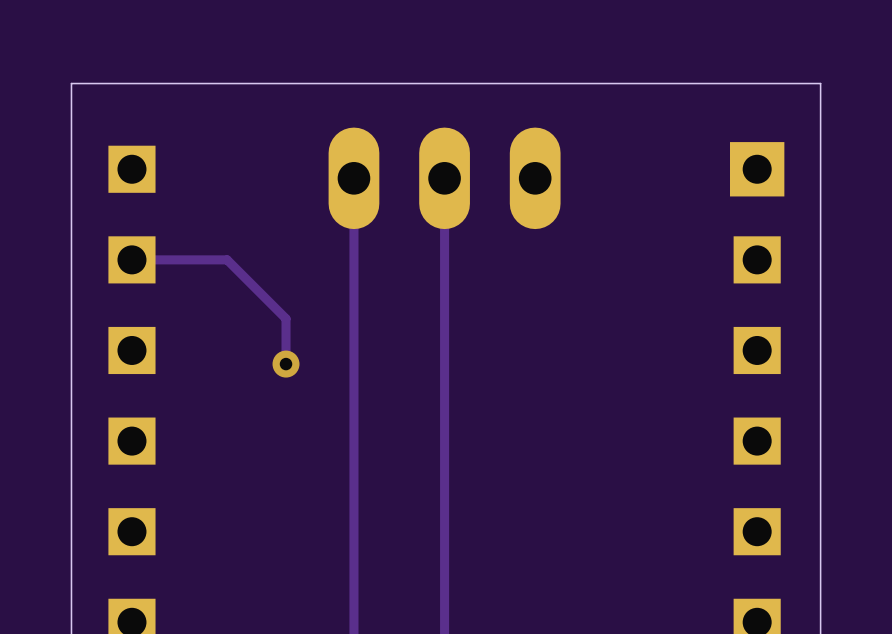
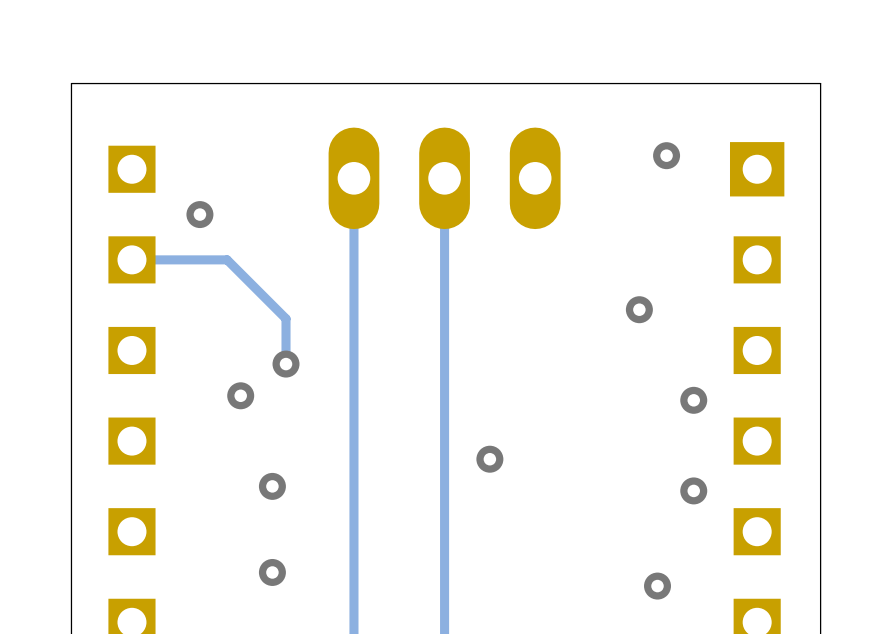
via: none -> (666, 155)
via: none -> (199, 214)
via: none -> (639, 309)
via: none -> (240, 395)
via: none -> (693, 400)
via: none -> (489, 459)
via: none -> (272, 486)
via: none -> (693, 490)
via: none -> (272, 572)
via: none -> (657, 586)

